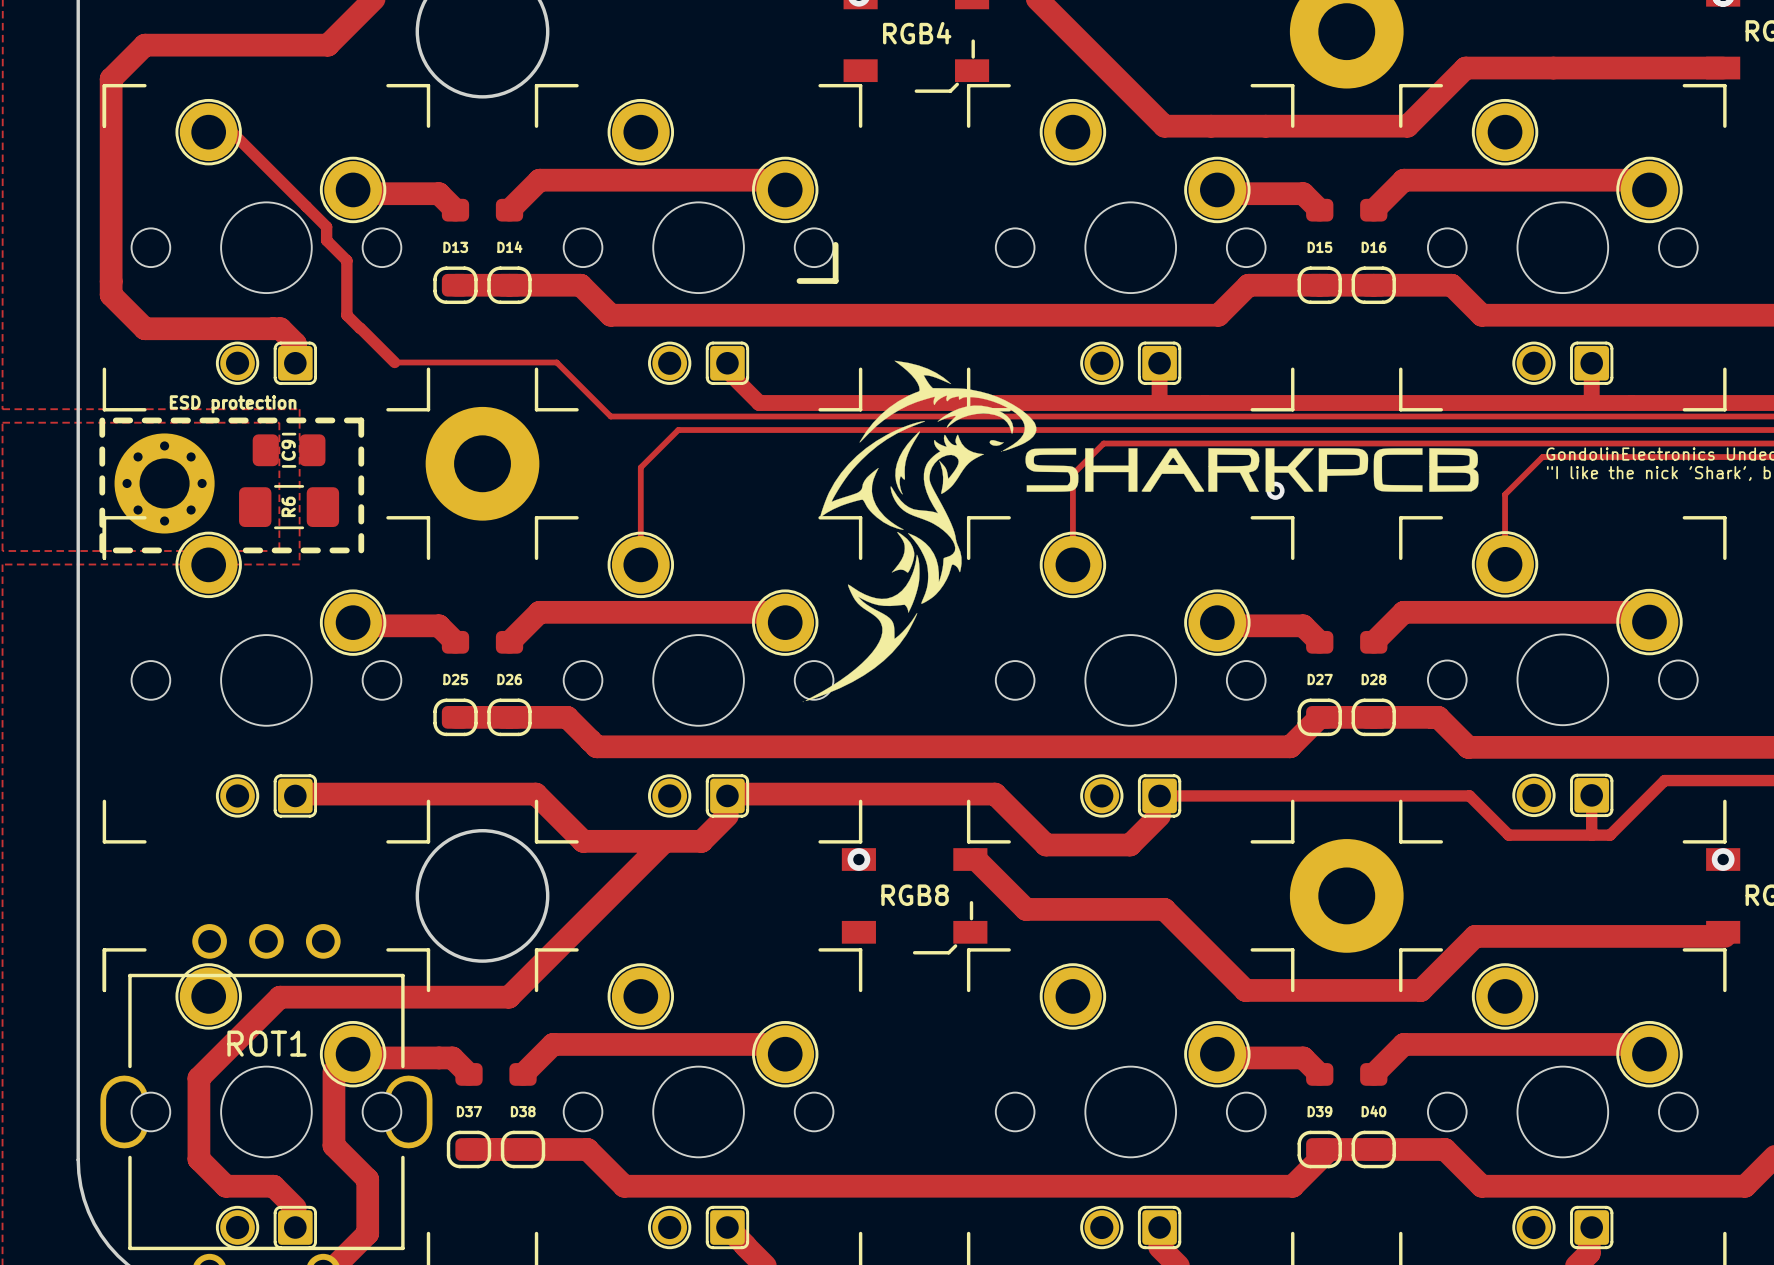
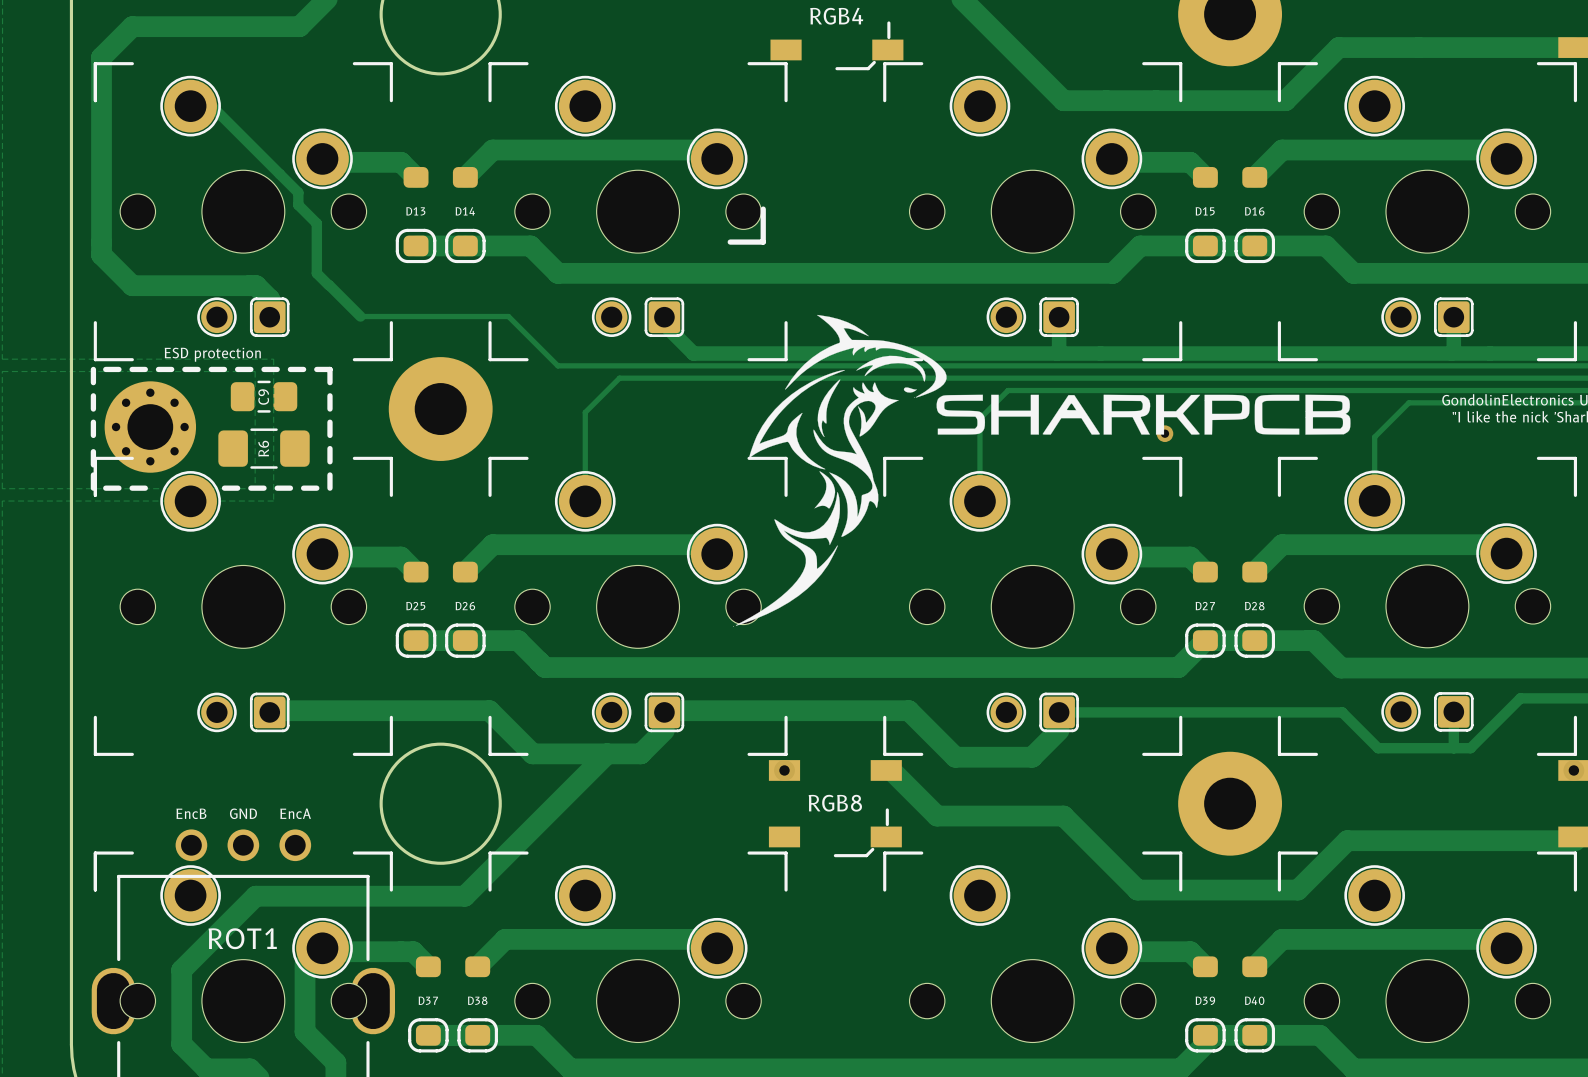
line: (968, 369) (968, 409) -> none
text: none -> EncB (191, 813)
text: none -> GND (243, 813)
text: none -> EncA (295, 813)

